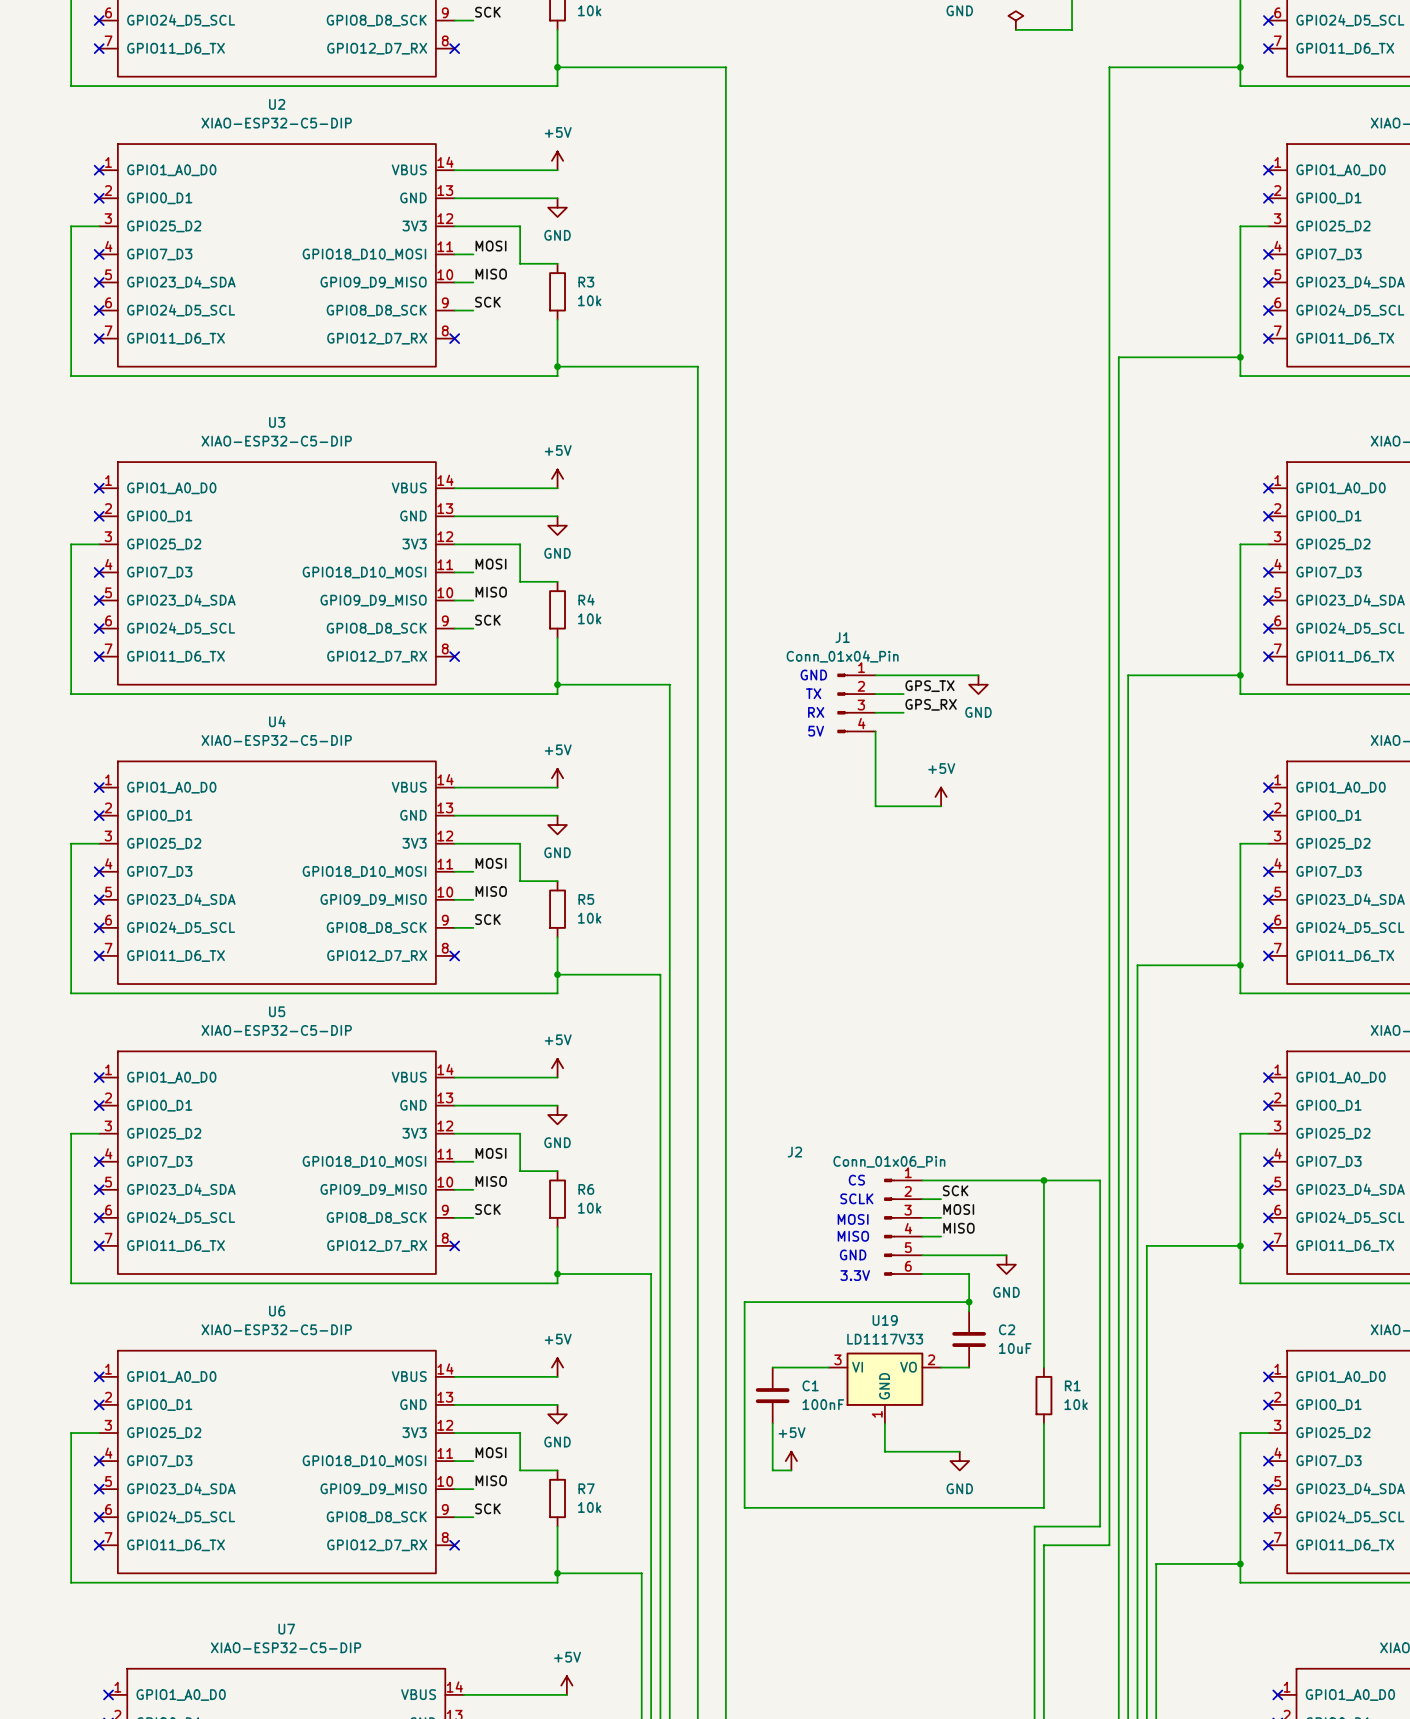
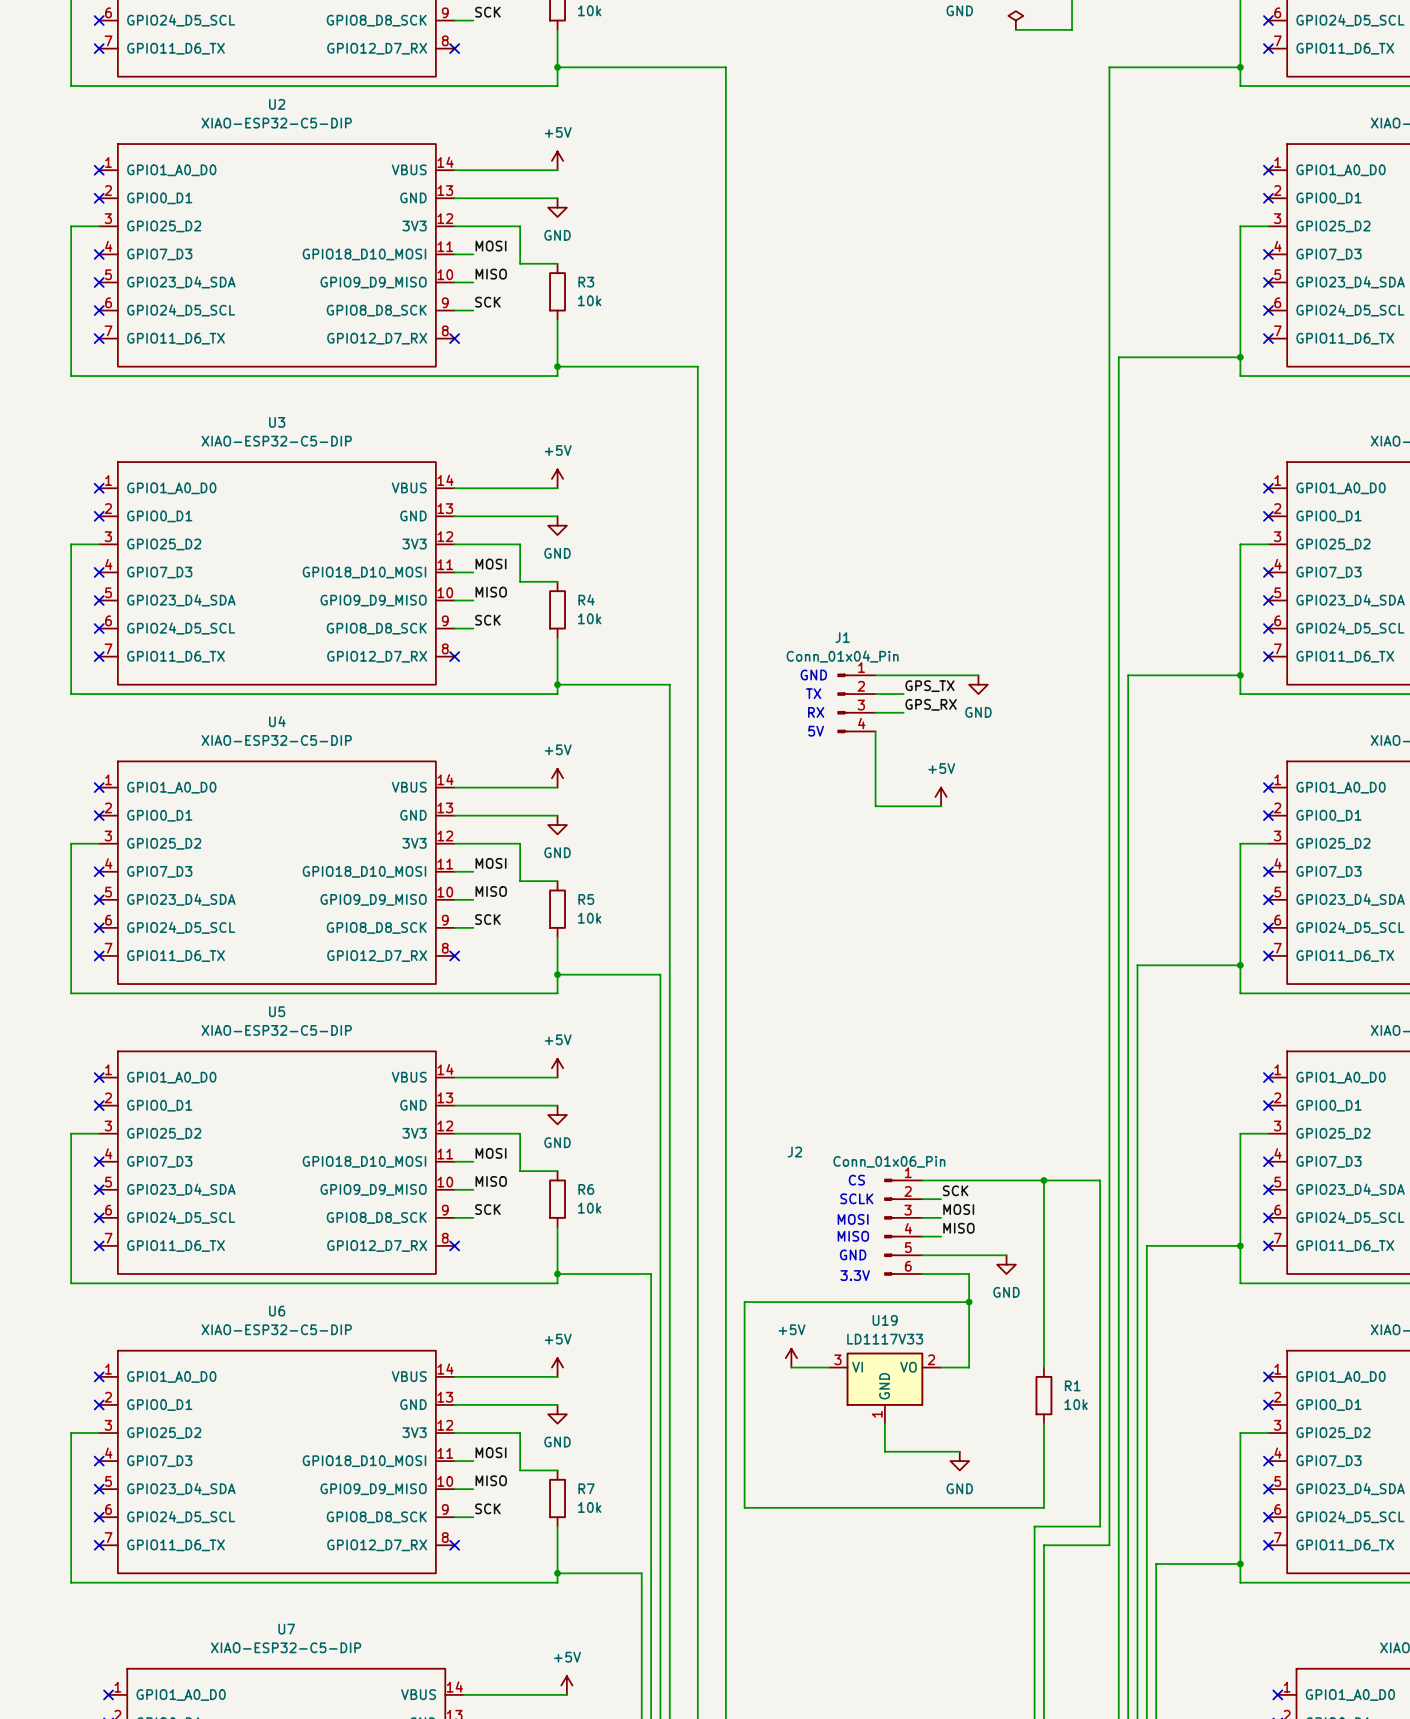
C2: 10uF (969, 1339) -> none
wire: (772, 1367) (791, 1367) -> none
C1: 100nF (772, 1395) -> none
wire: (772, 1423) (772, 1470) (791, 1470) -> none
power symbol position: +5V (791, 1461) -> +5V (791, 1358)

